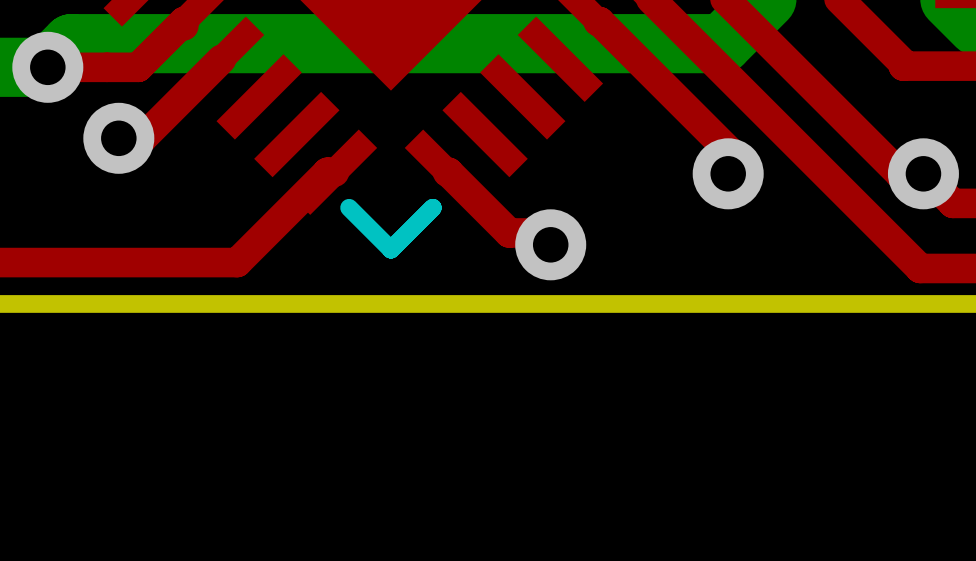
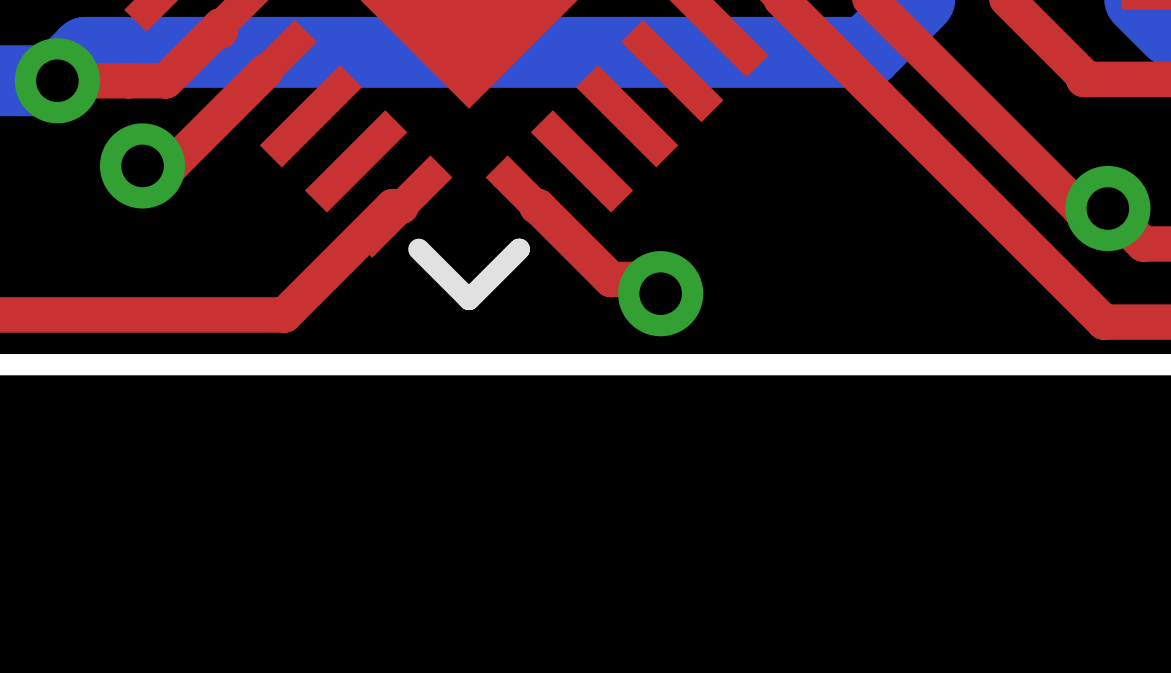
top track: (599, 21) (734, 156) (734, 167) (728, 173) -> none
via: (728, 173) -> none

